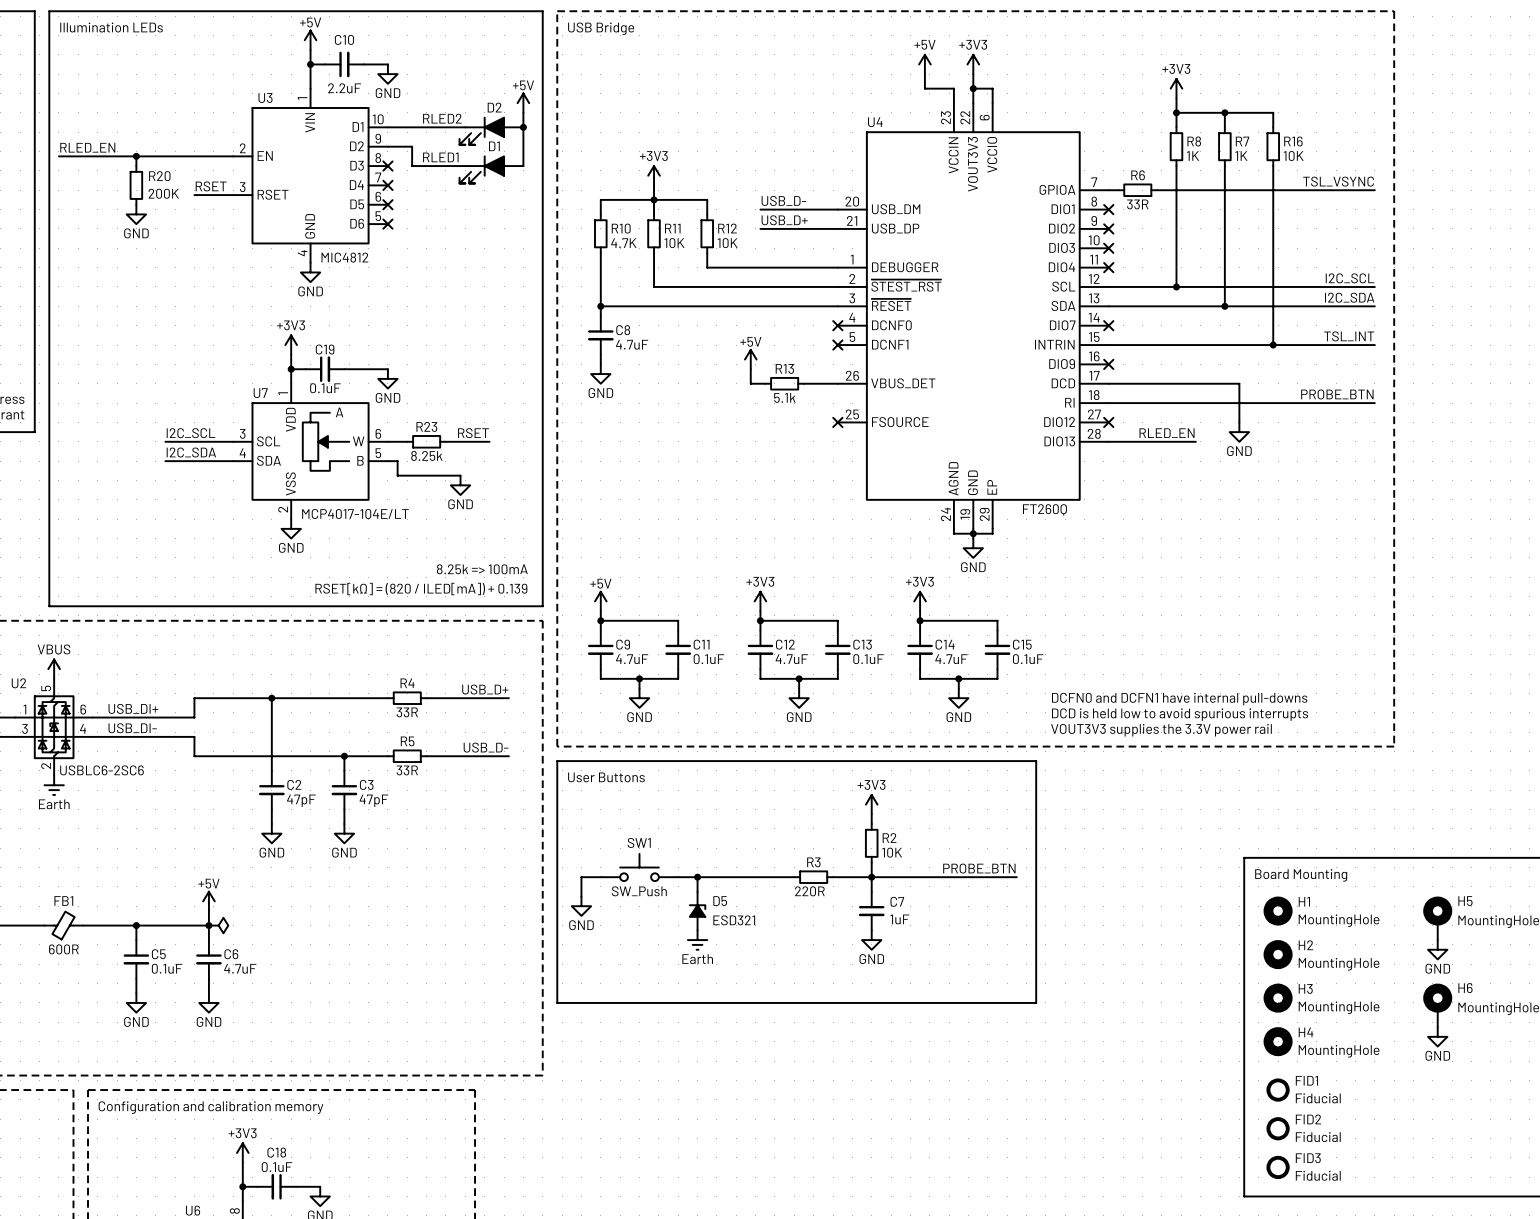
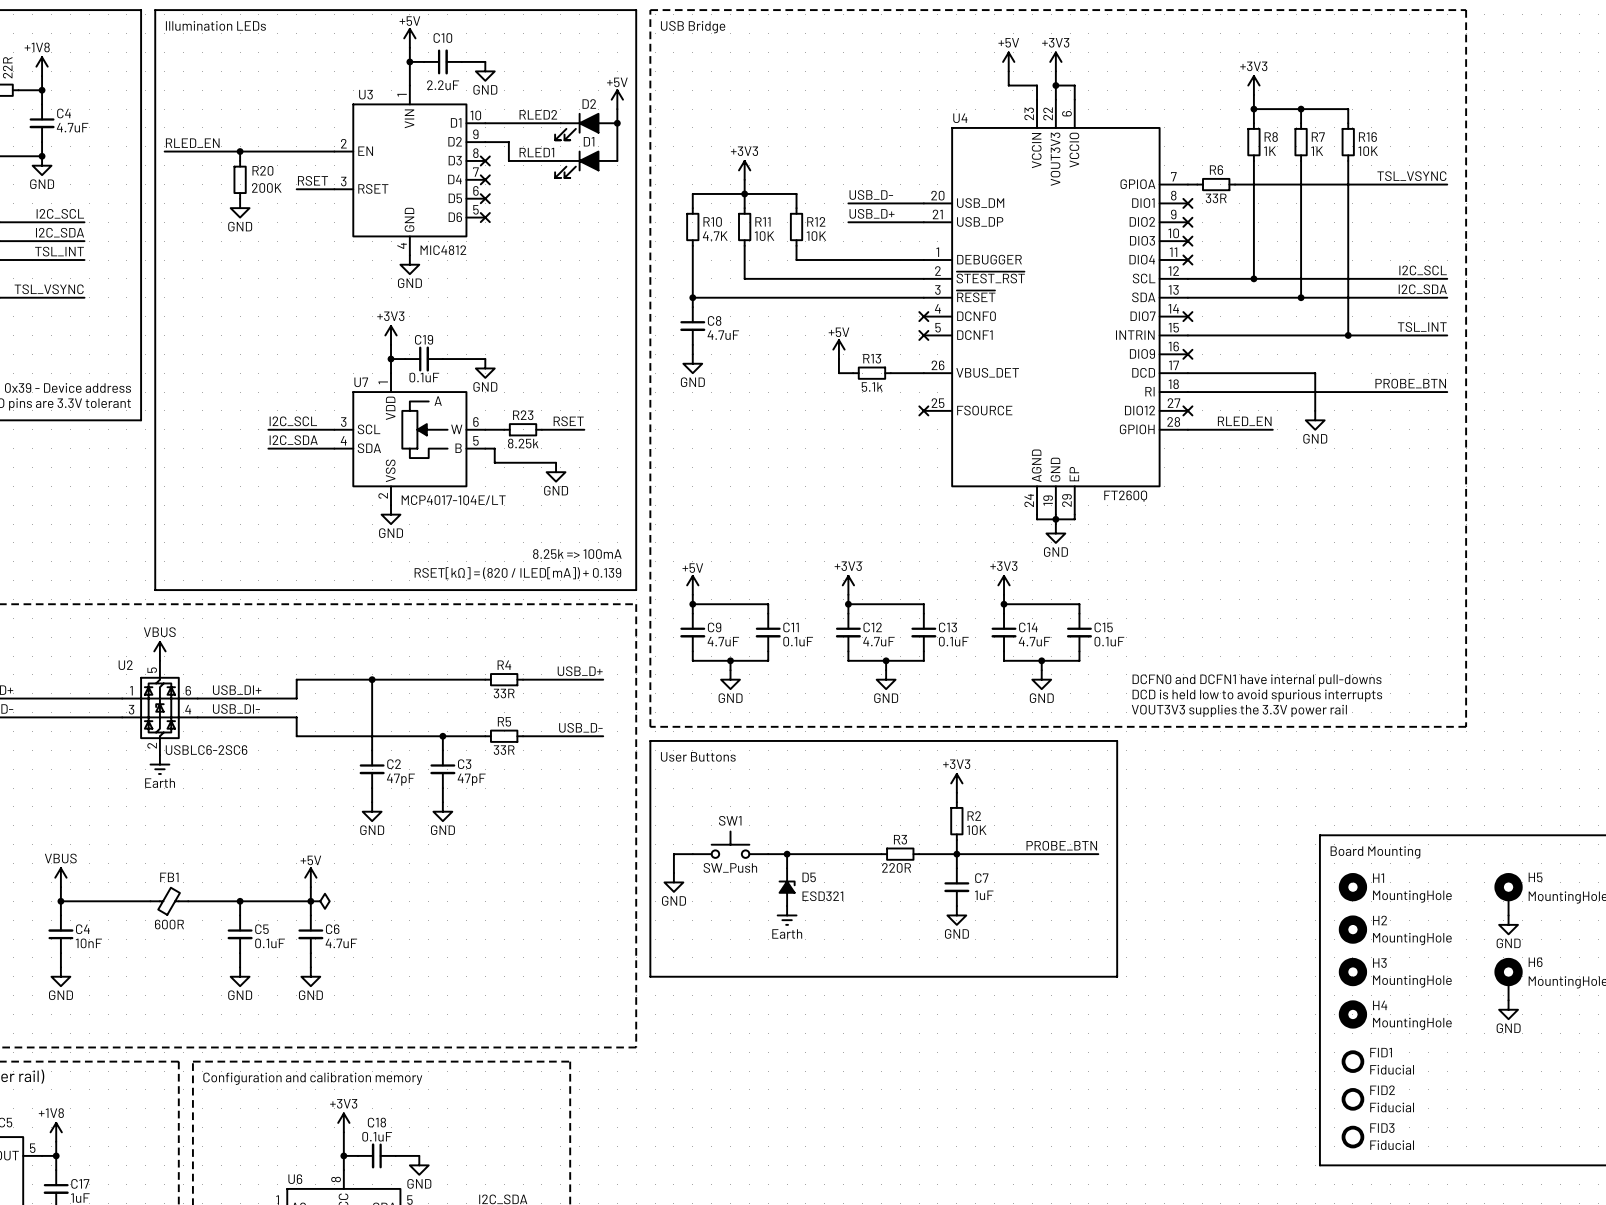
U4 pin name: DIO13 (1059, 441) -> GPIOH (1137, 429)

